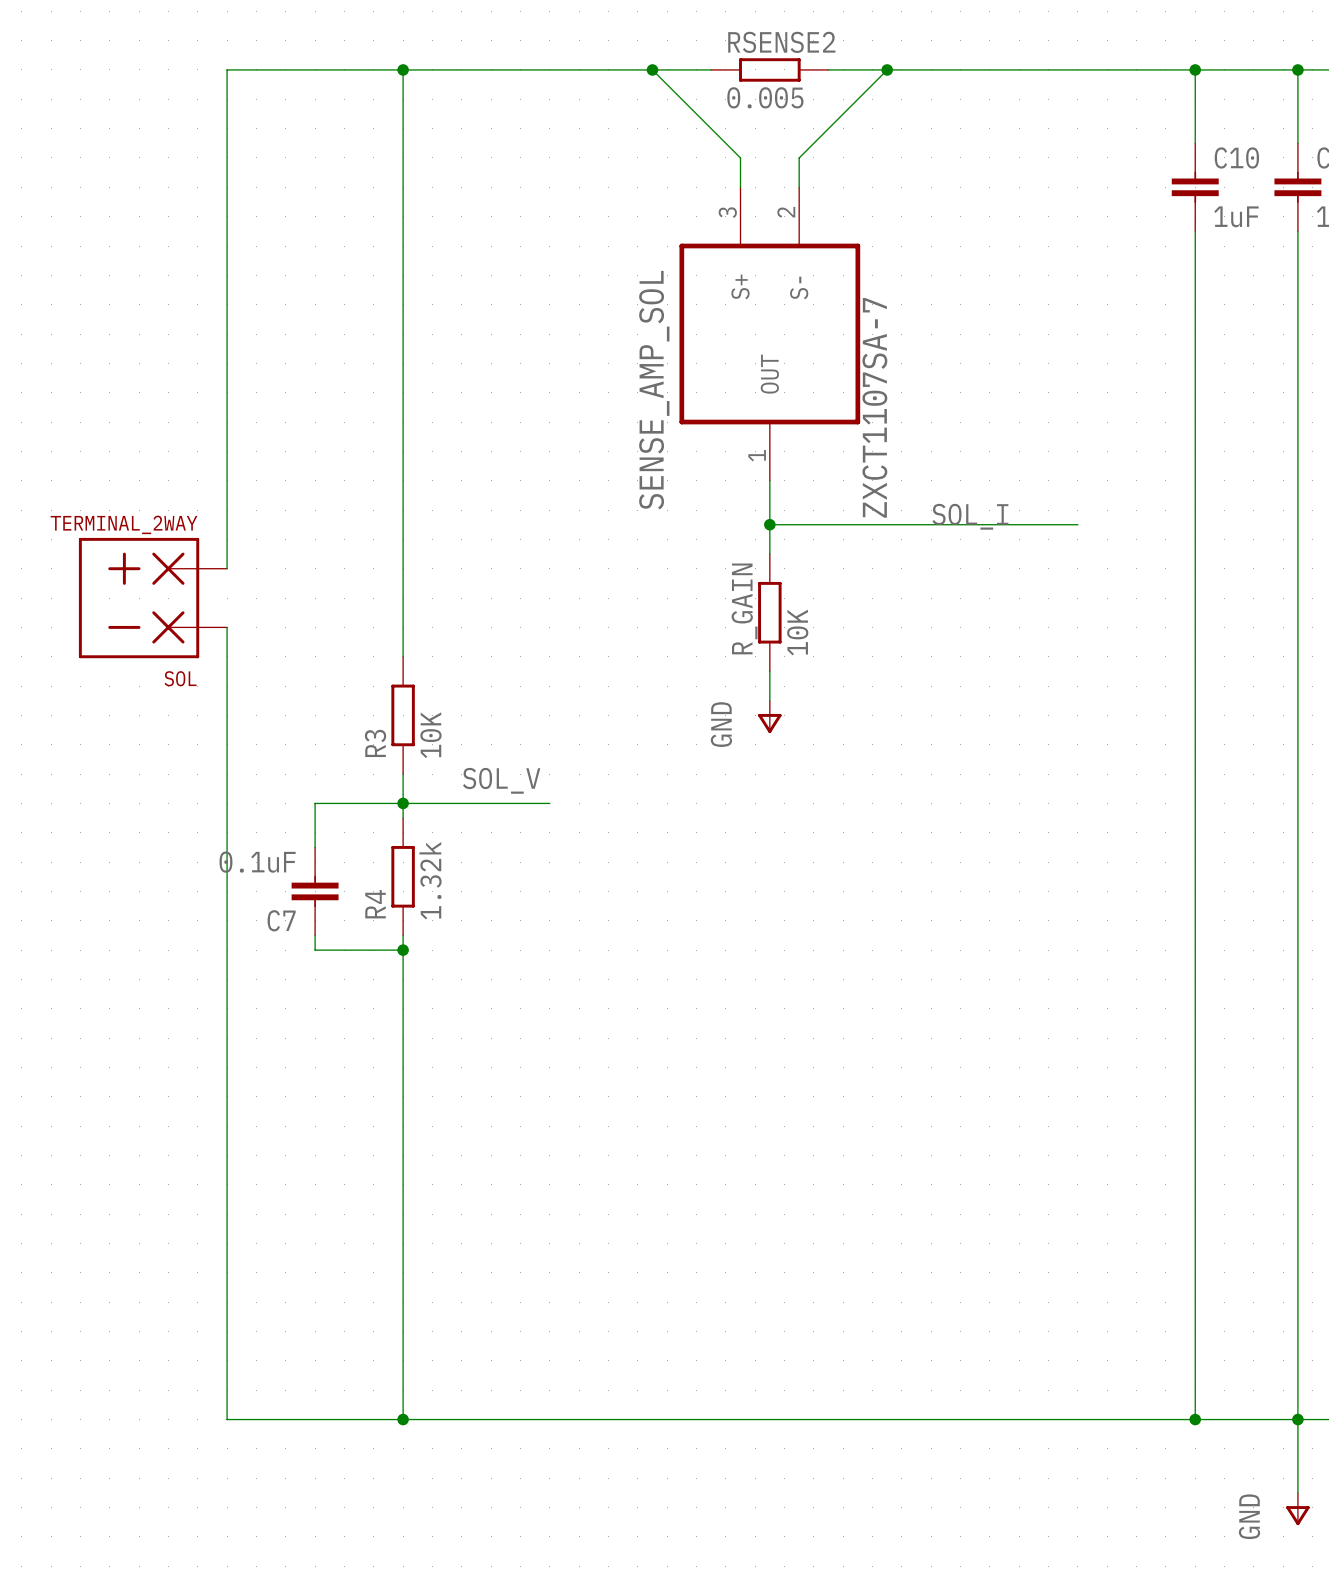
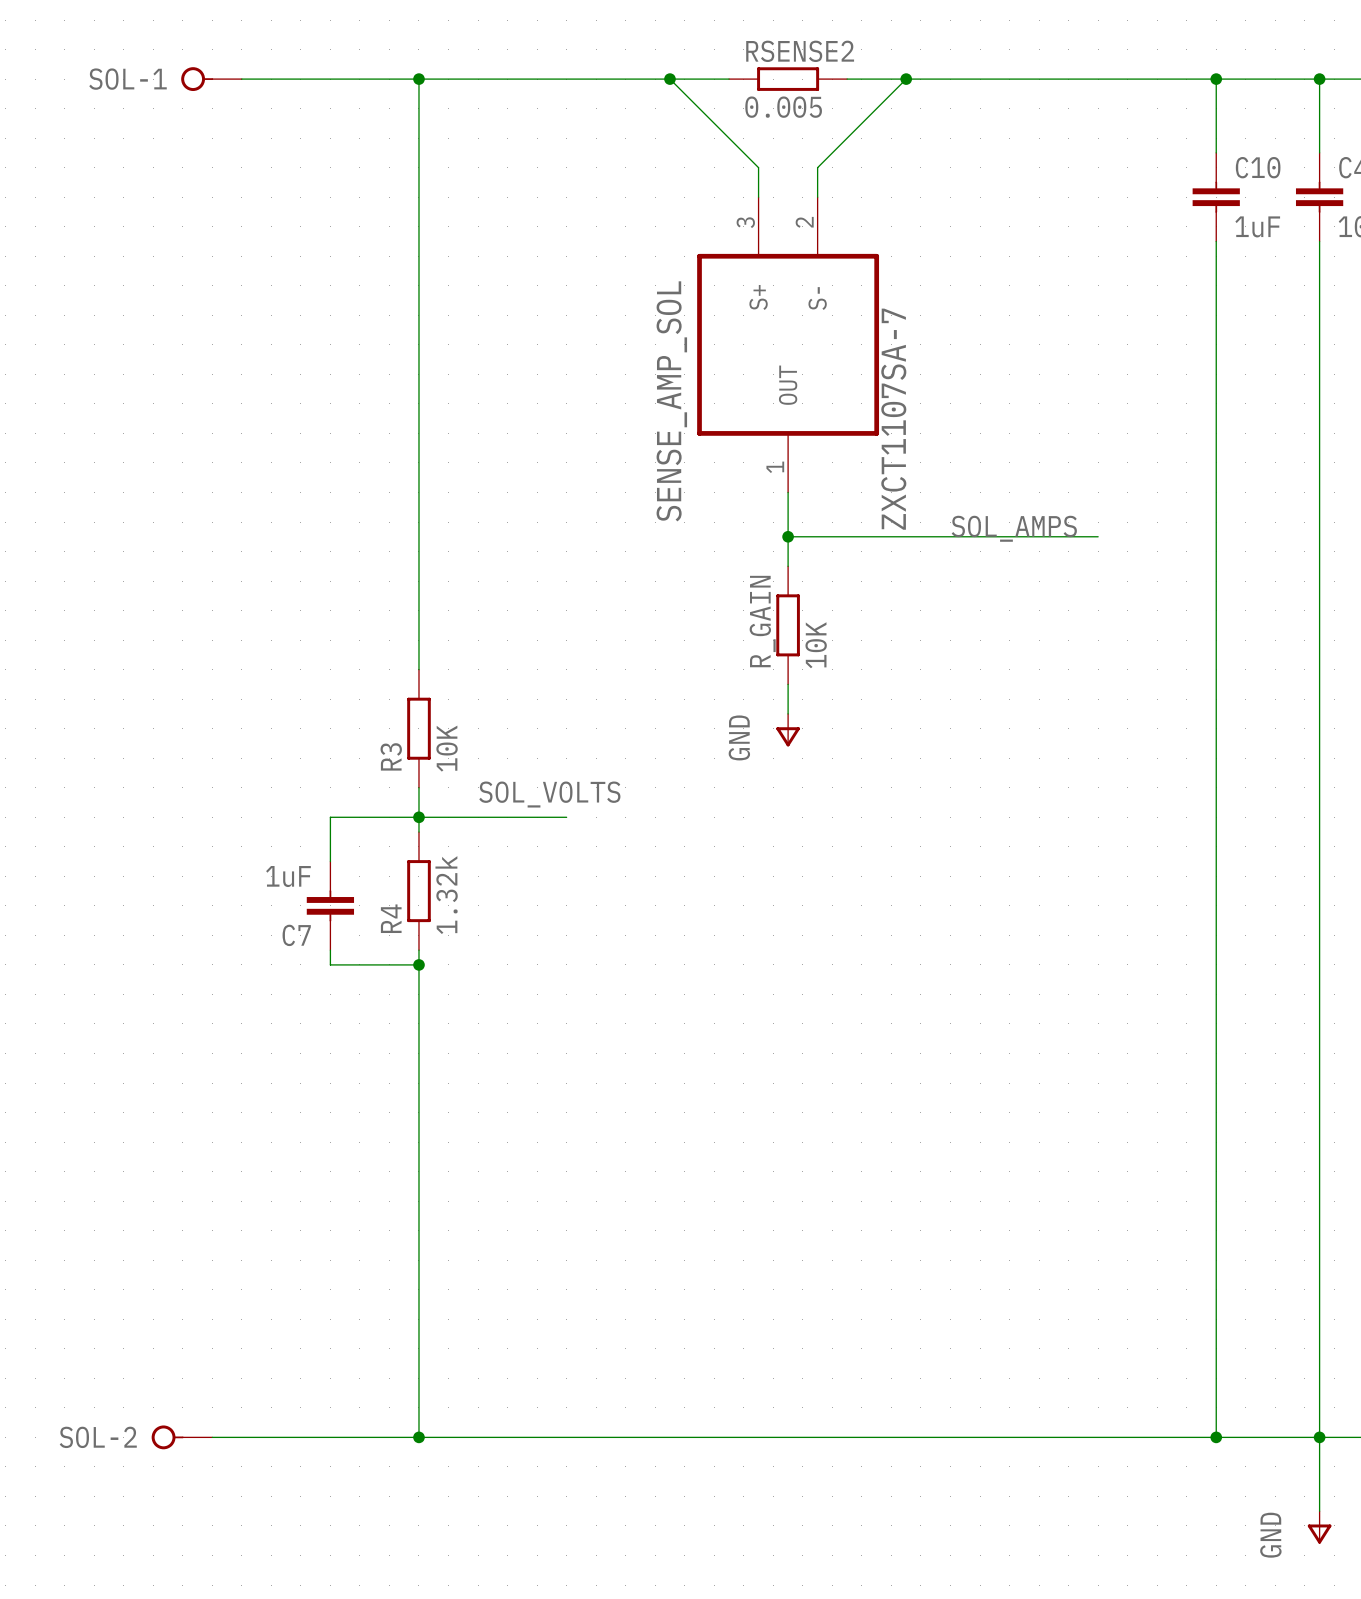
SOL-1: none -> (211, 79)
wire: (227, 69) (227, 568) -> none
label: SOL_I (970, 516) -> SOL_AMPS (1014, 528)
SOL: TERMINAL_2WAY (152, 598) -> none
wire: (227, 627) (227, 1419) -> (212, 1437) (241, 1437)
label: SOL_V (501, 780) -> SOL_VOLTS (549, 794)
C7 value: 0.1uF (257, 862) -> 1uF (288, 876)
SOL-2: none -> (181, 1437)

